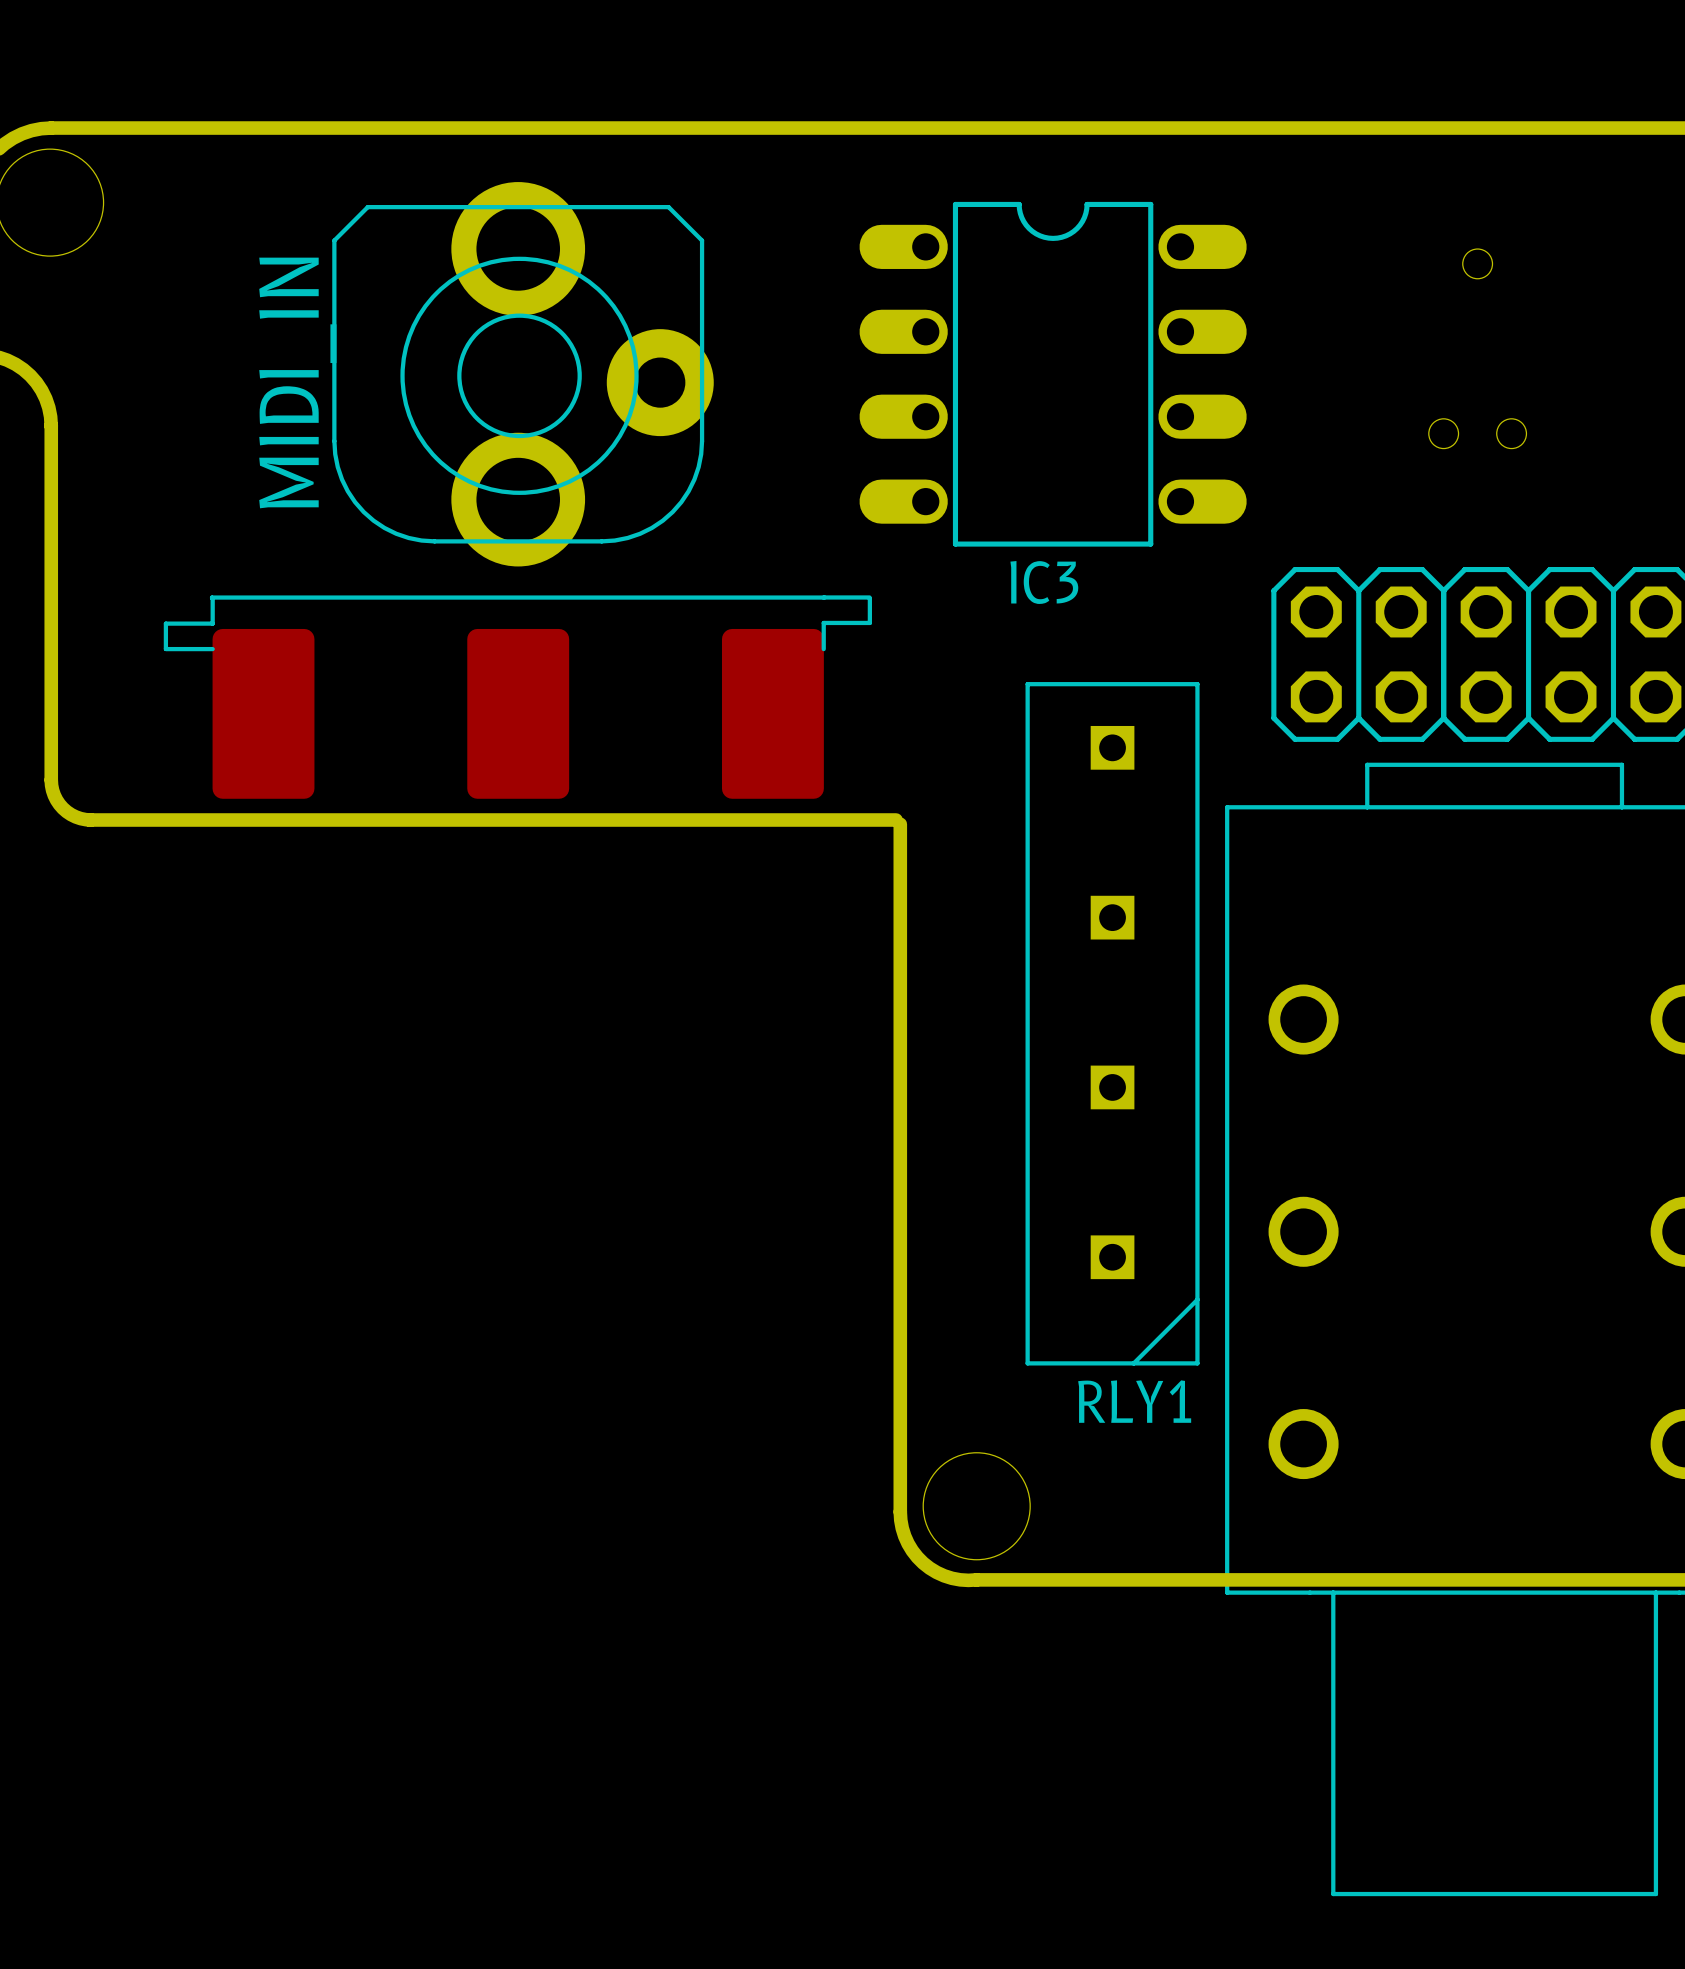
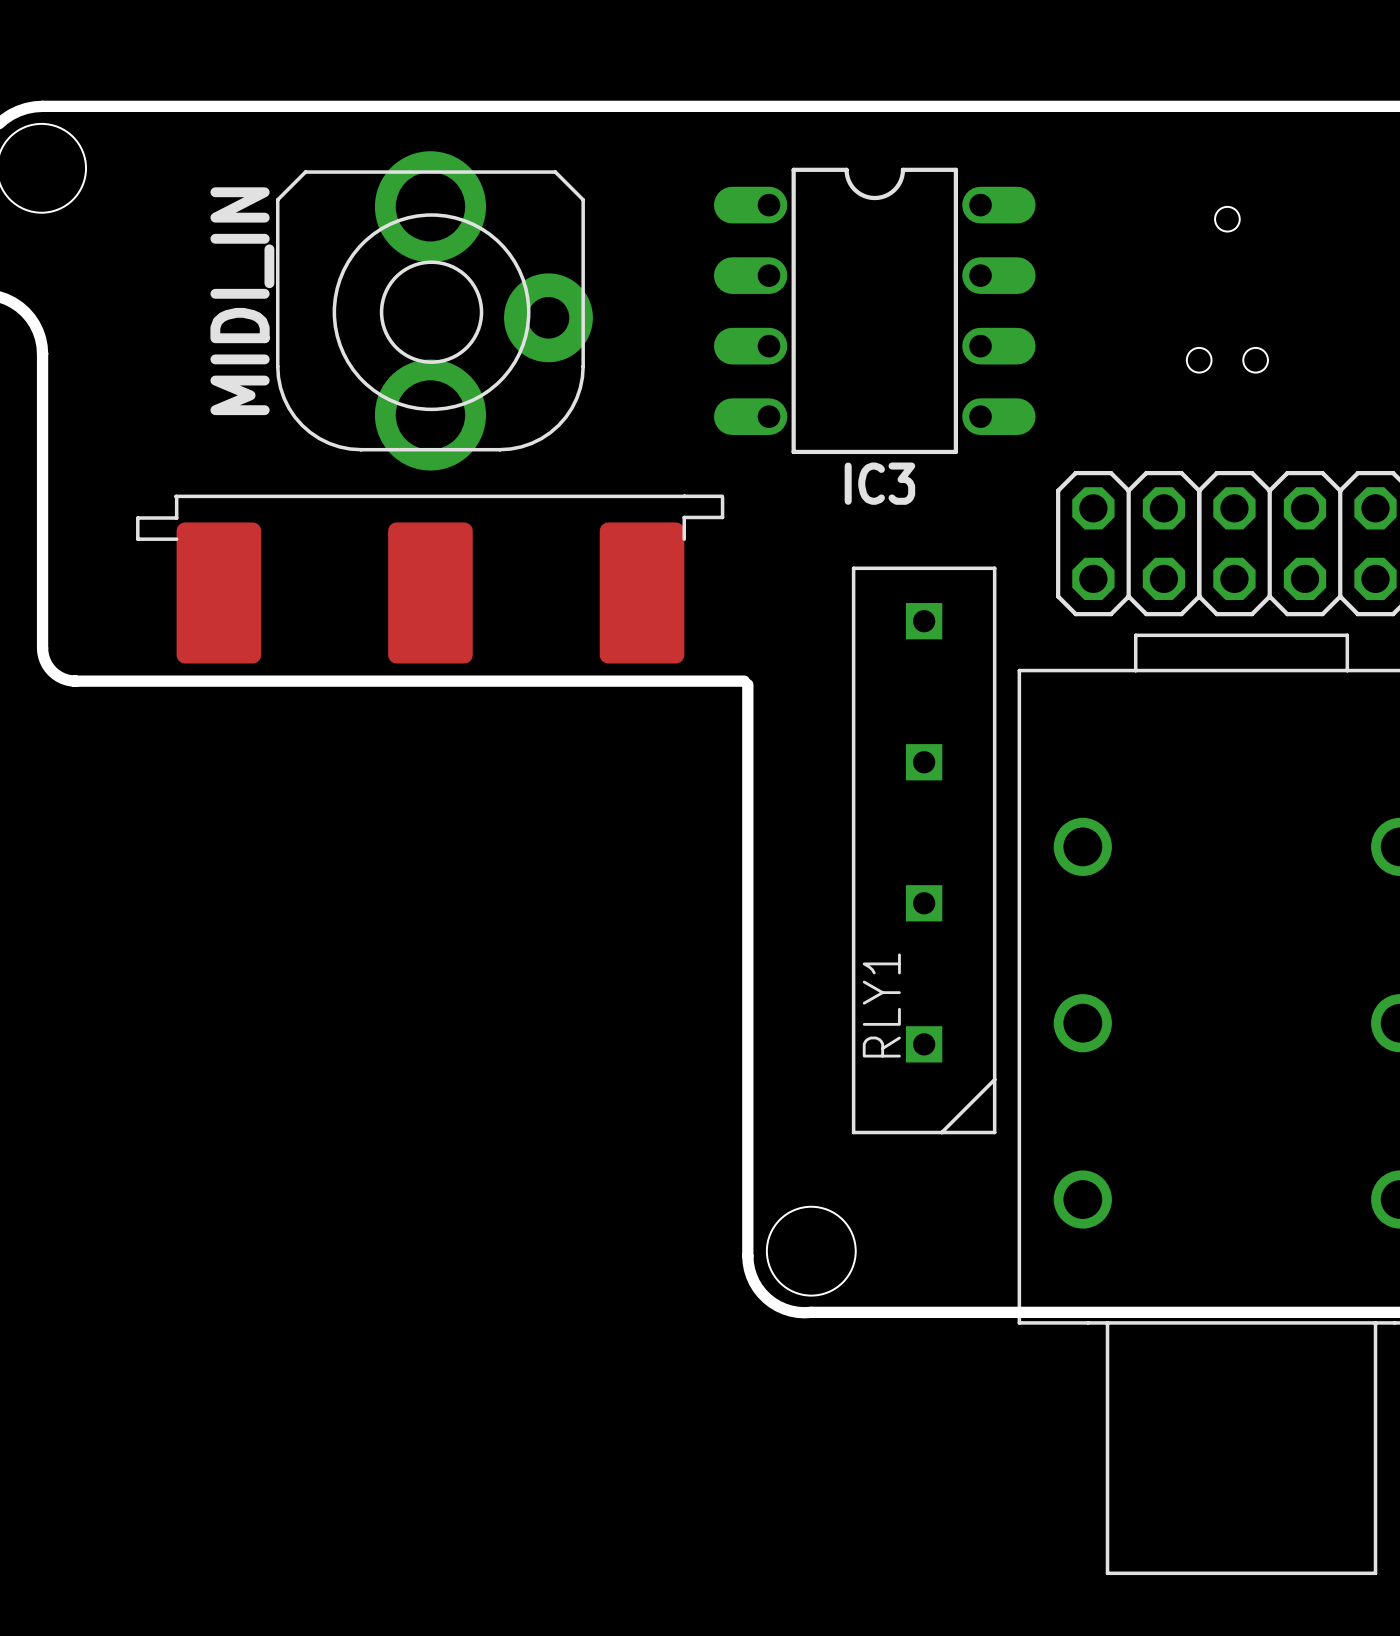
RLY1 name rotation: 0° (1134, 1401) -> 90° counterclockwise (881, 1005)
RLY1 name position: RLY1 (1134, 1401) -> RLY1 (881, 1005)

